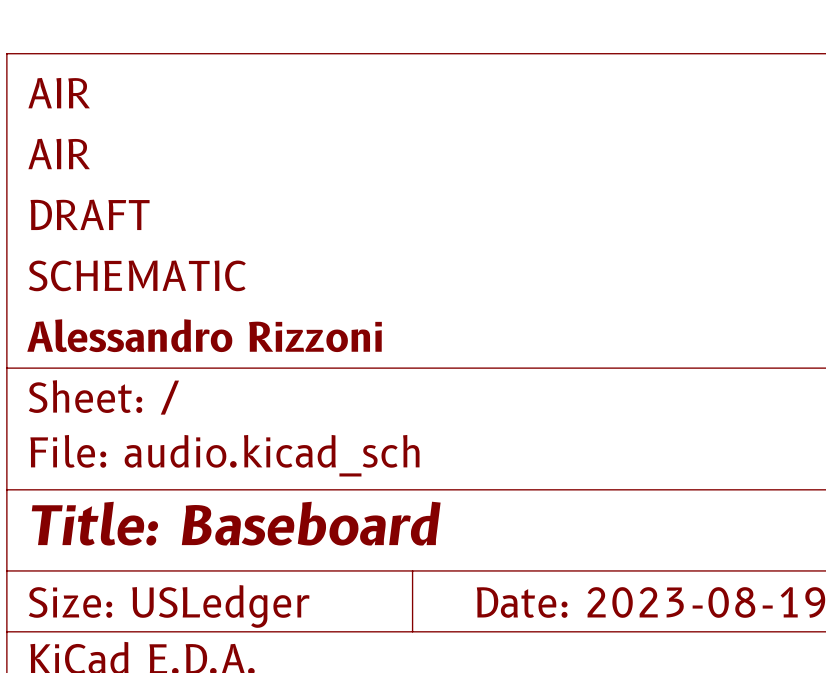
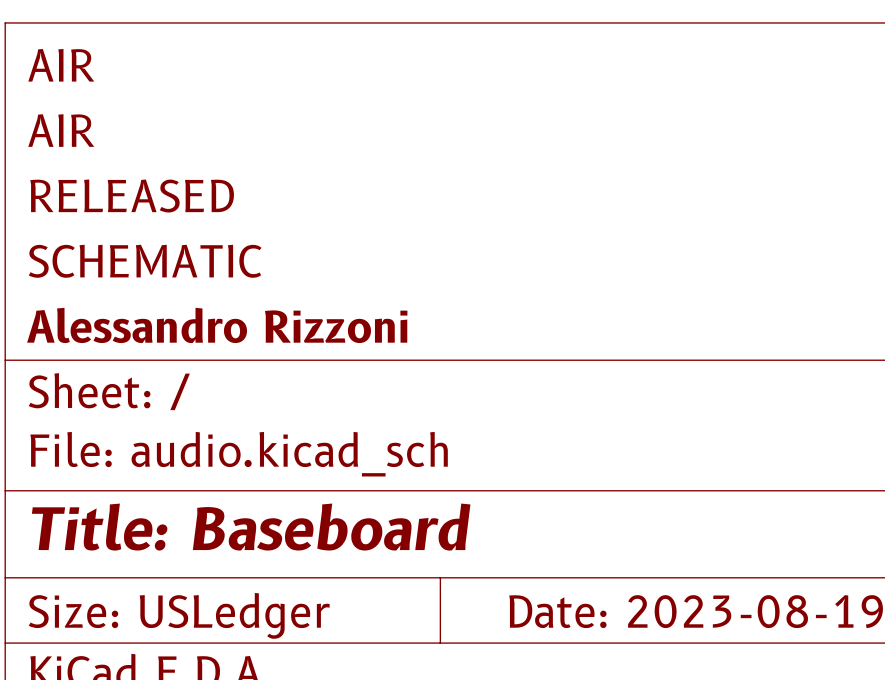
title block: DRAFT (90, 214) -> RELEASED (132, 196)

